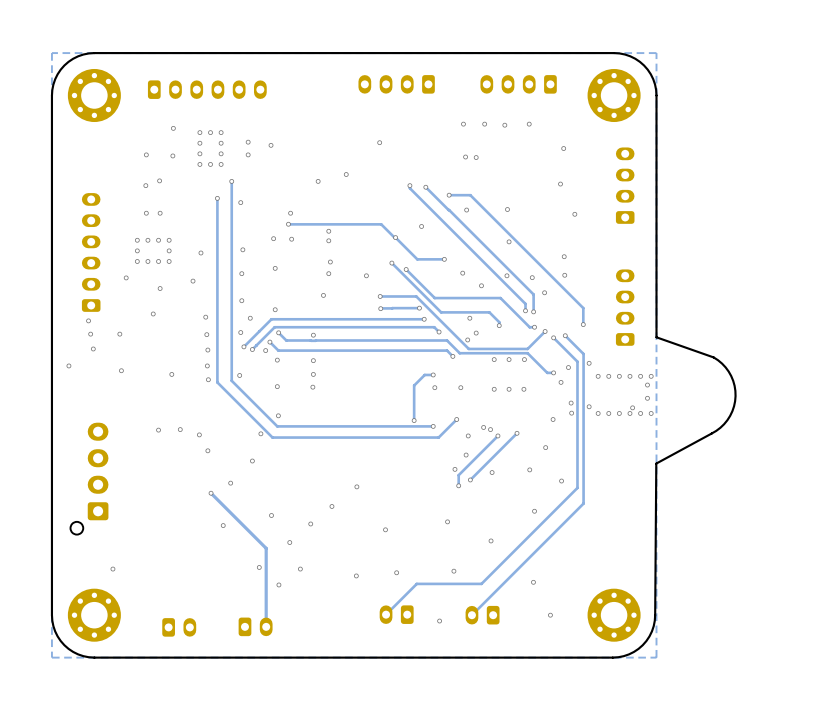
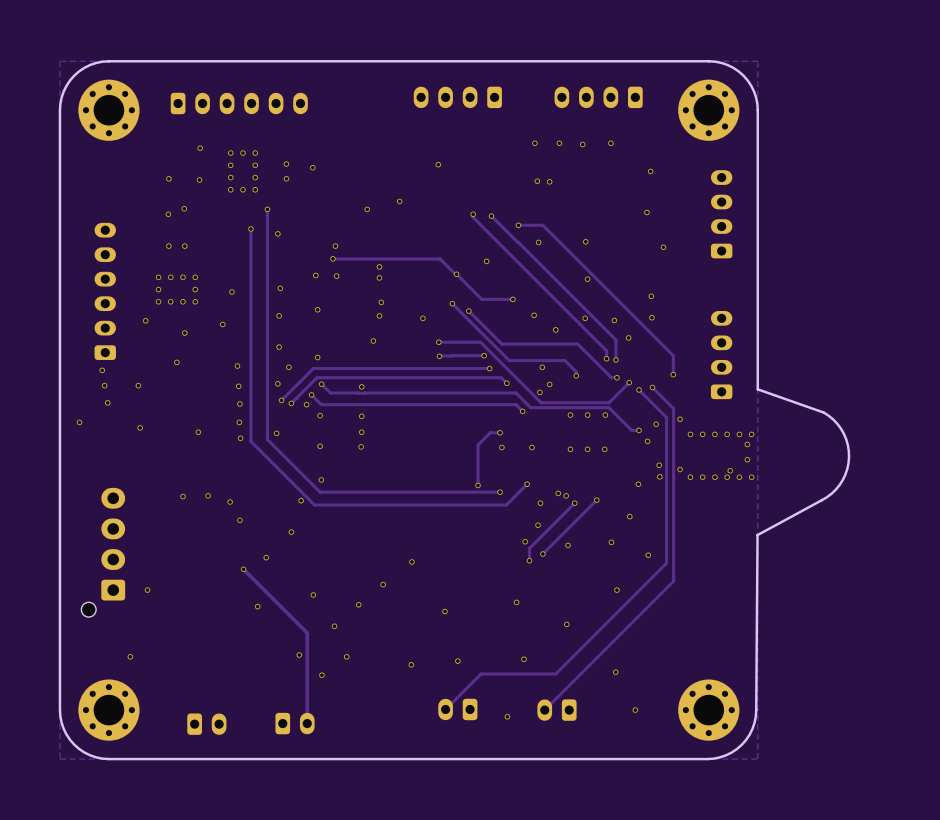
via: none -> (147, 590)

